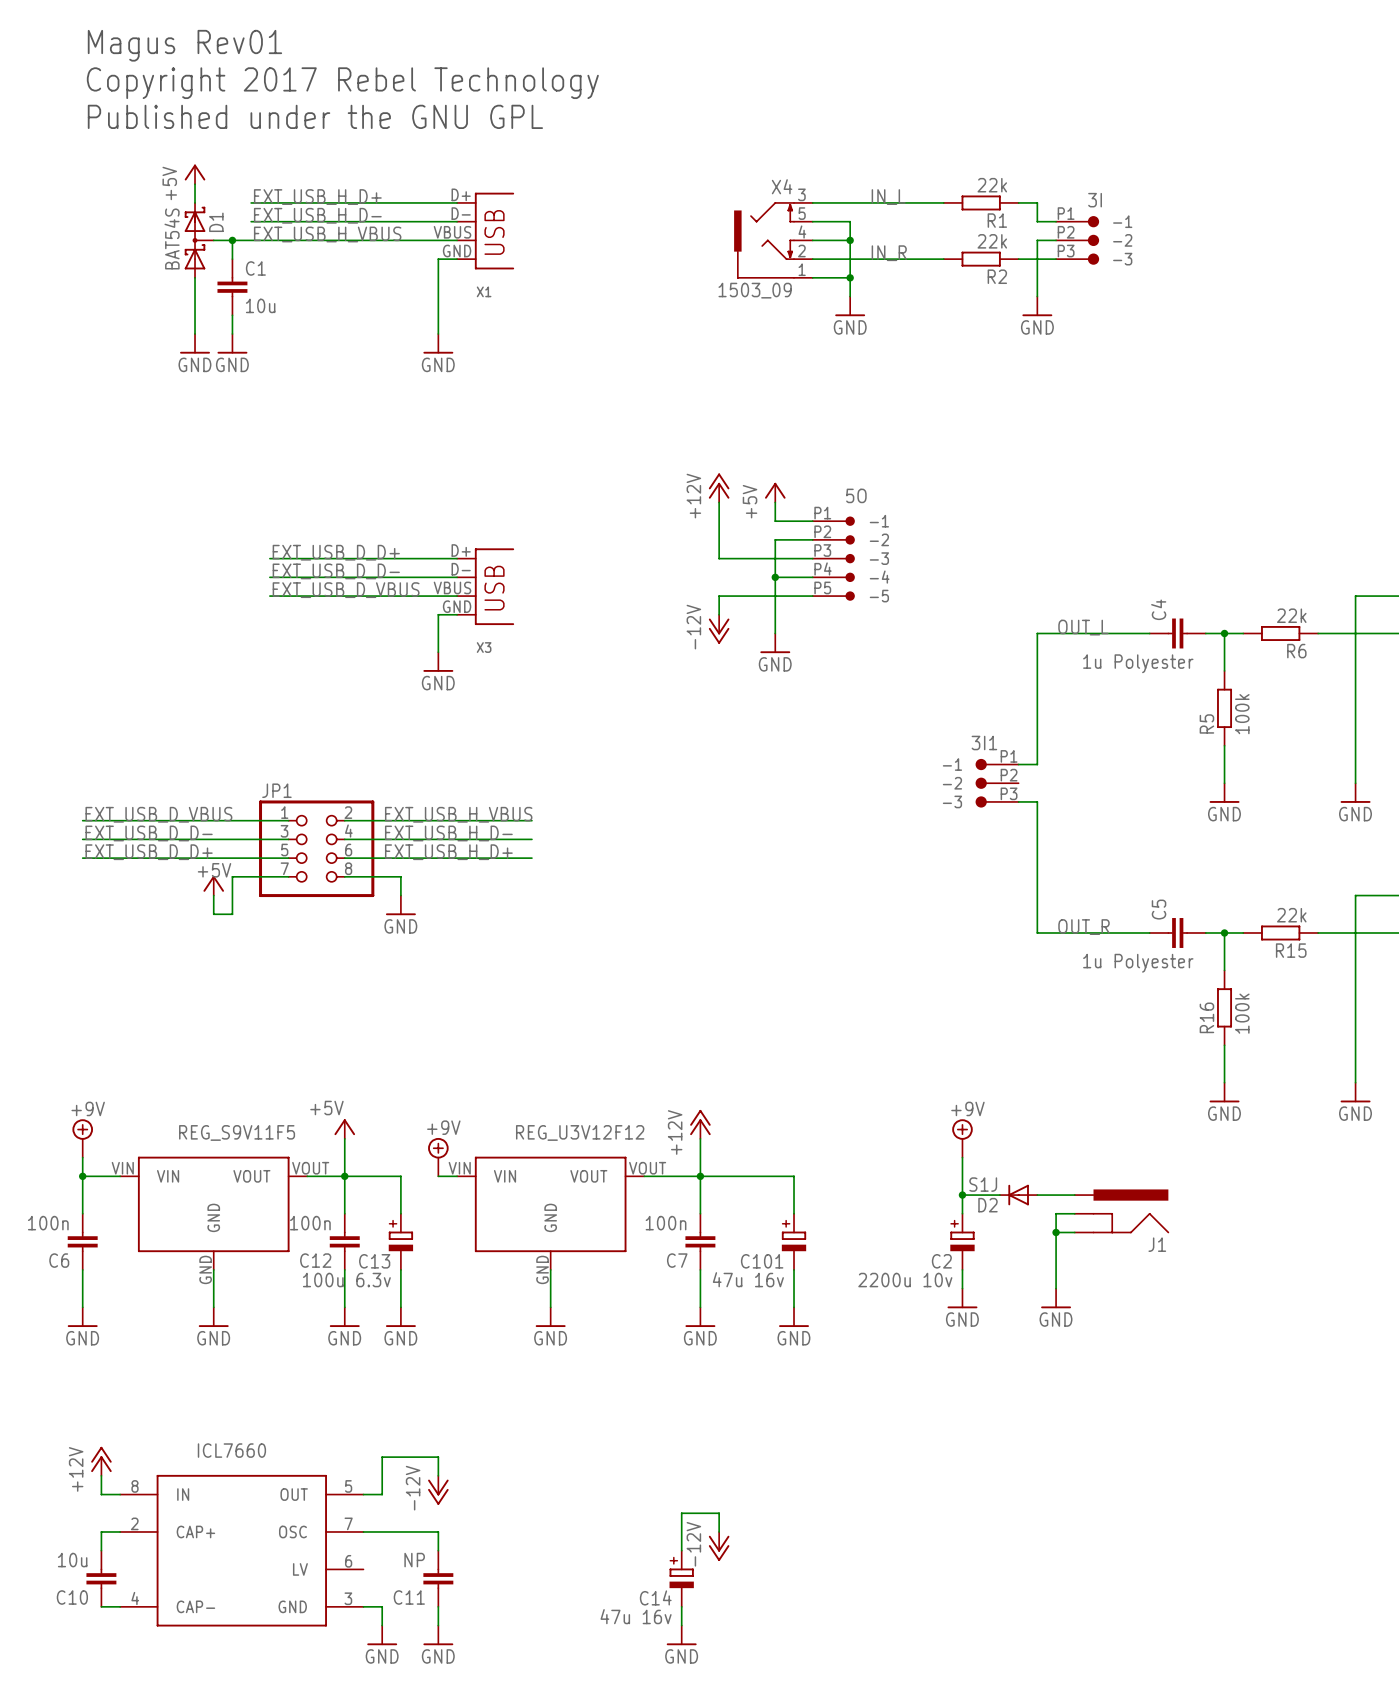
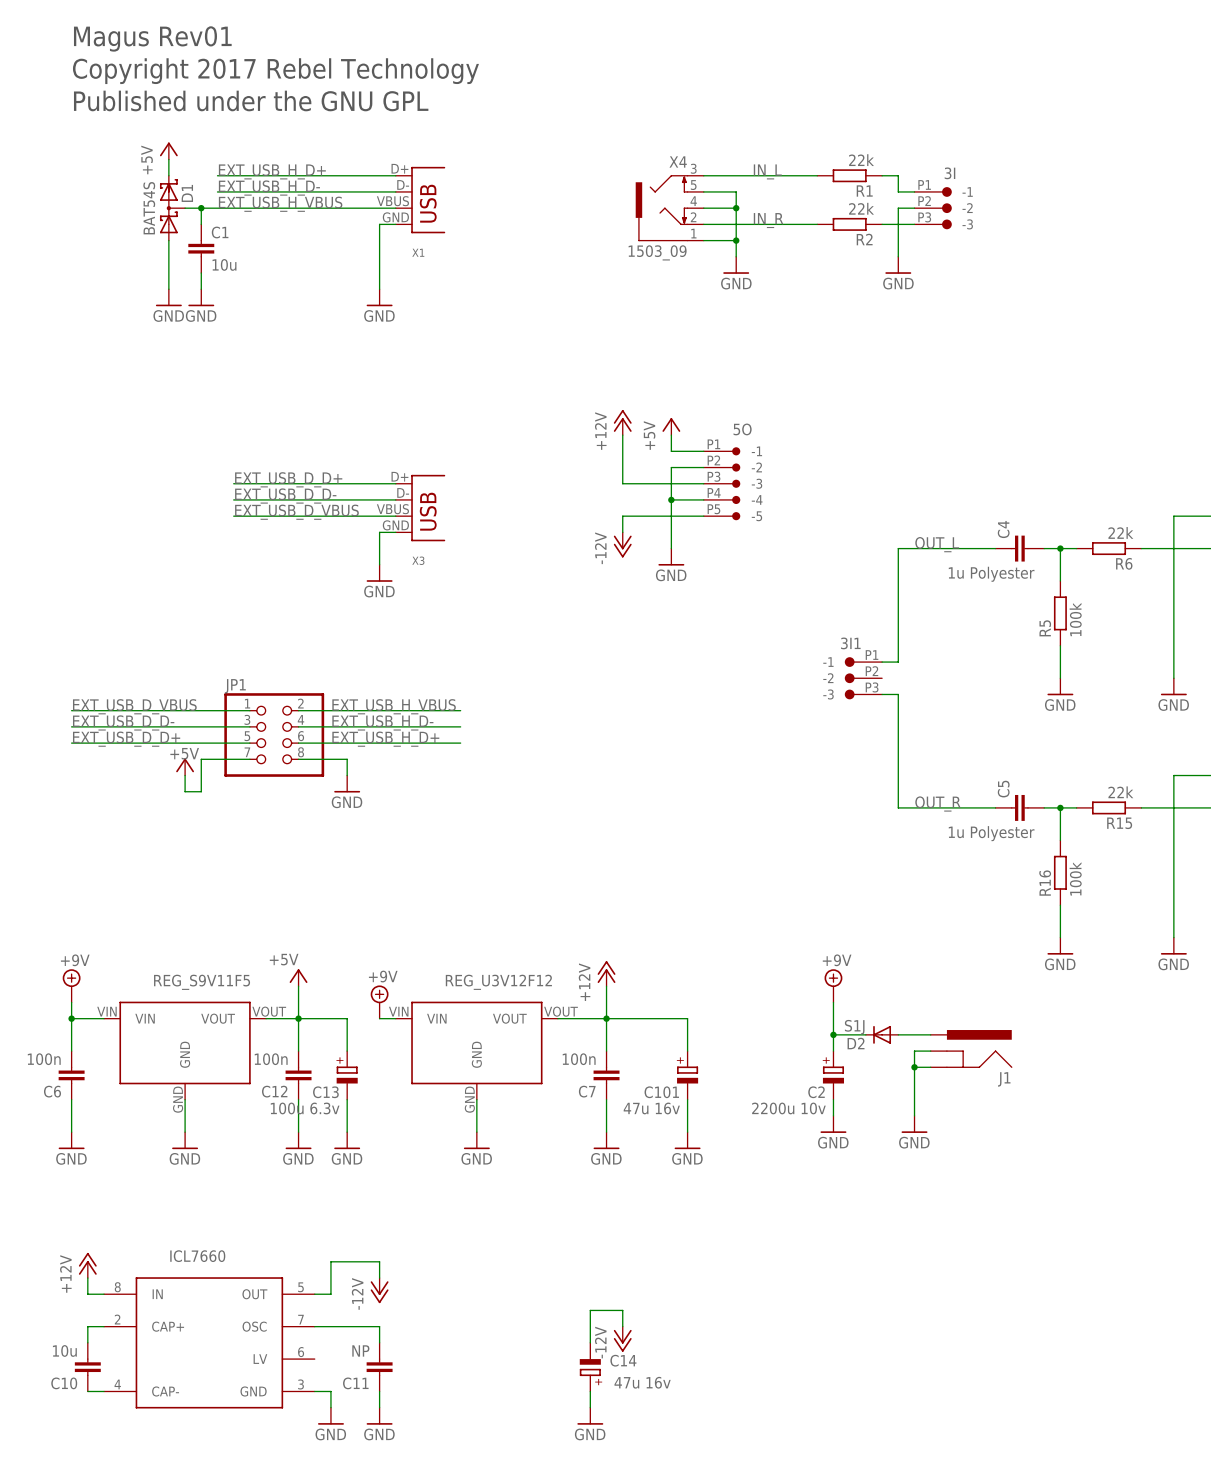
C14 symbol: [669, 1550, 694, 1607] -> [579, 1342, 601, 1392]
C14 name position: C14 (655, 1597) -> C14 (623, 1360)
C14 value position: 47u 16v (636, 1616) -> 47u 16v (642, 1382)

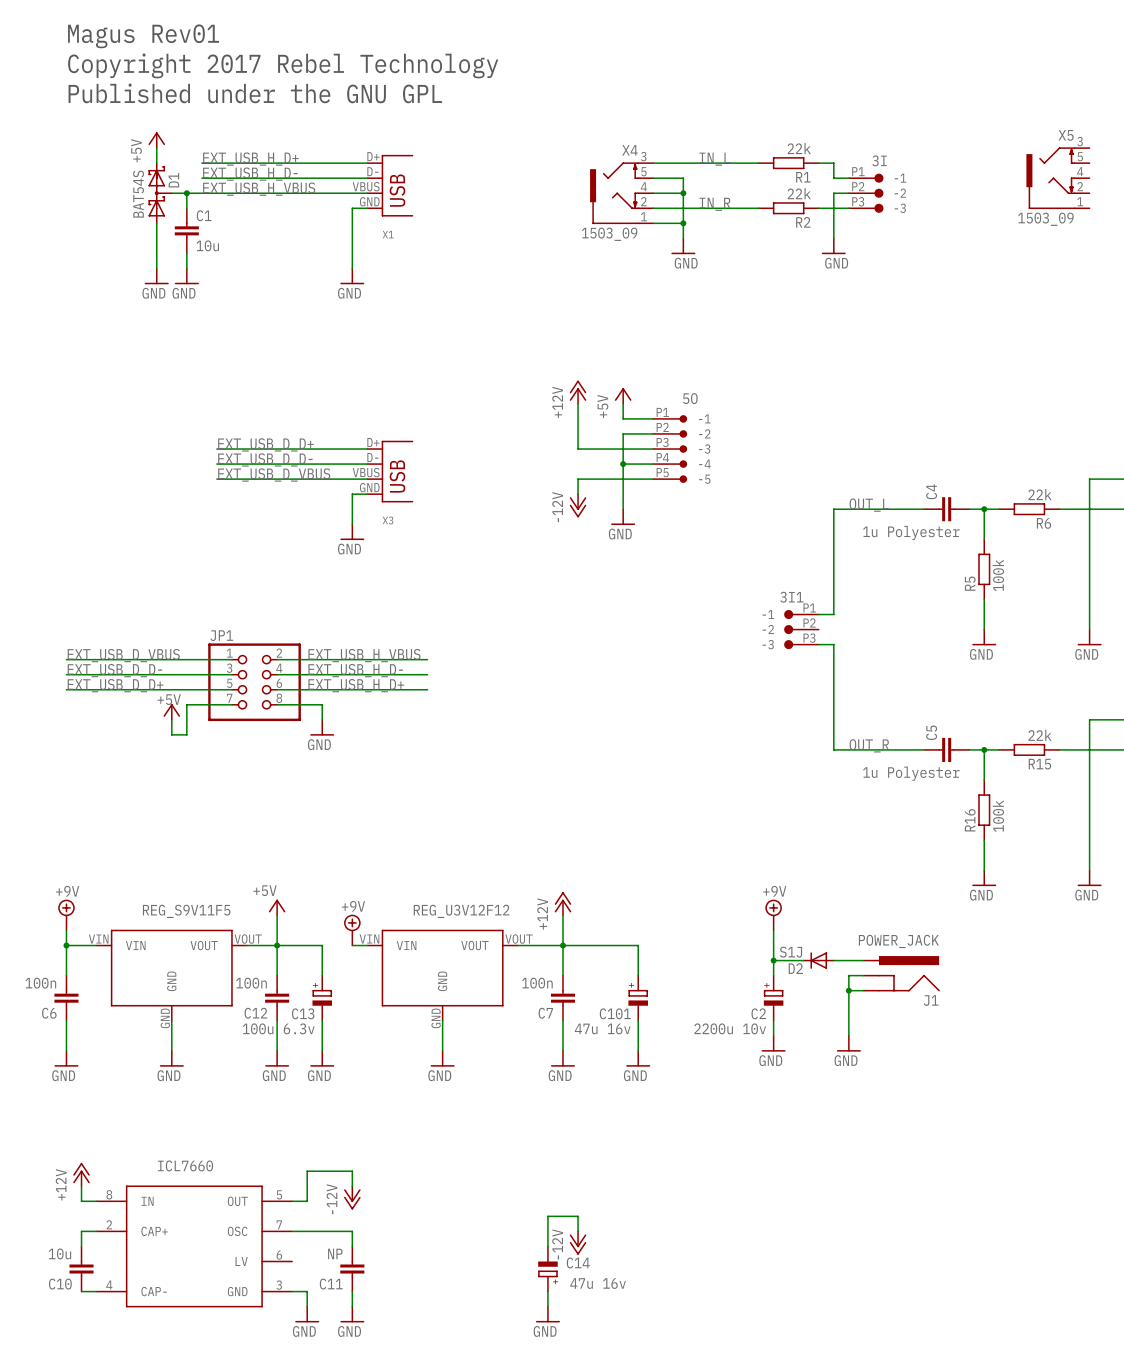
X5: none -> 1503_09 (1057, 178)
J1 value: none -> POWER_JACK (898, 941)

